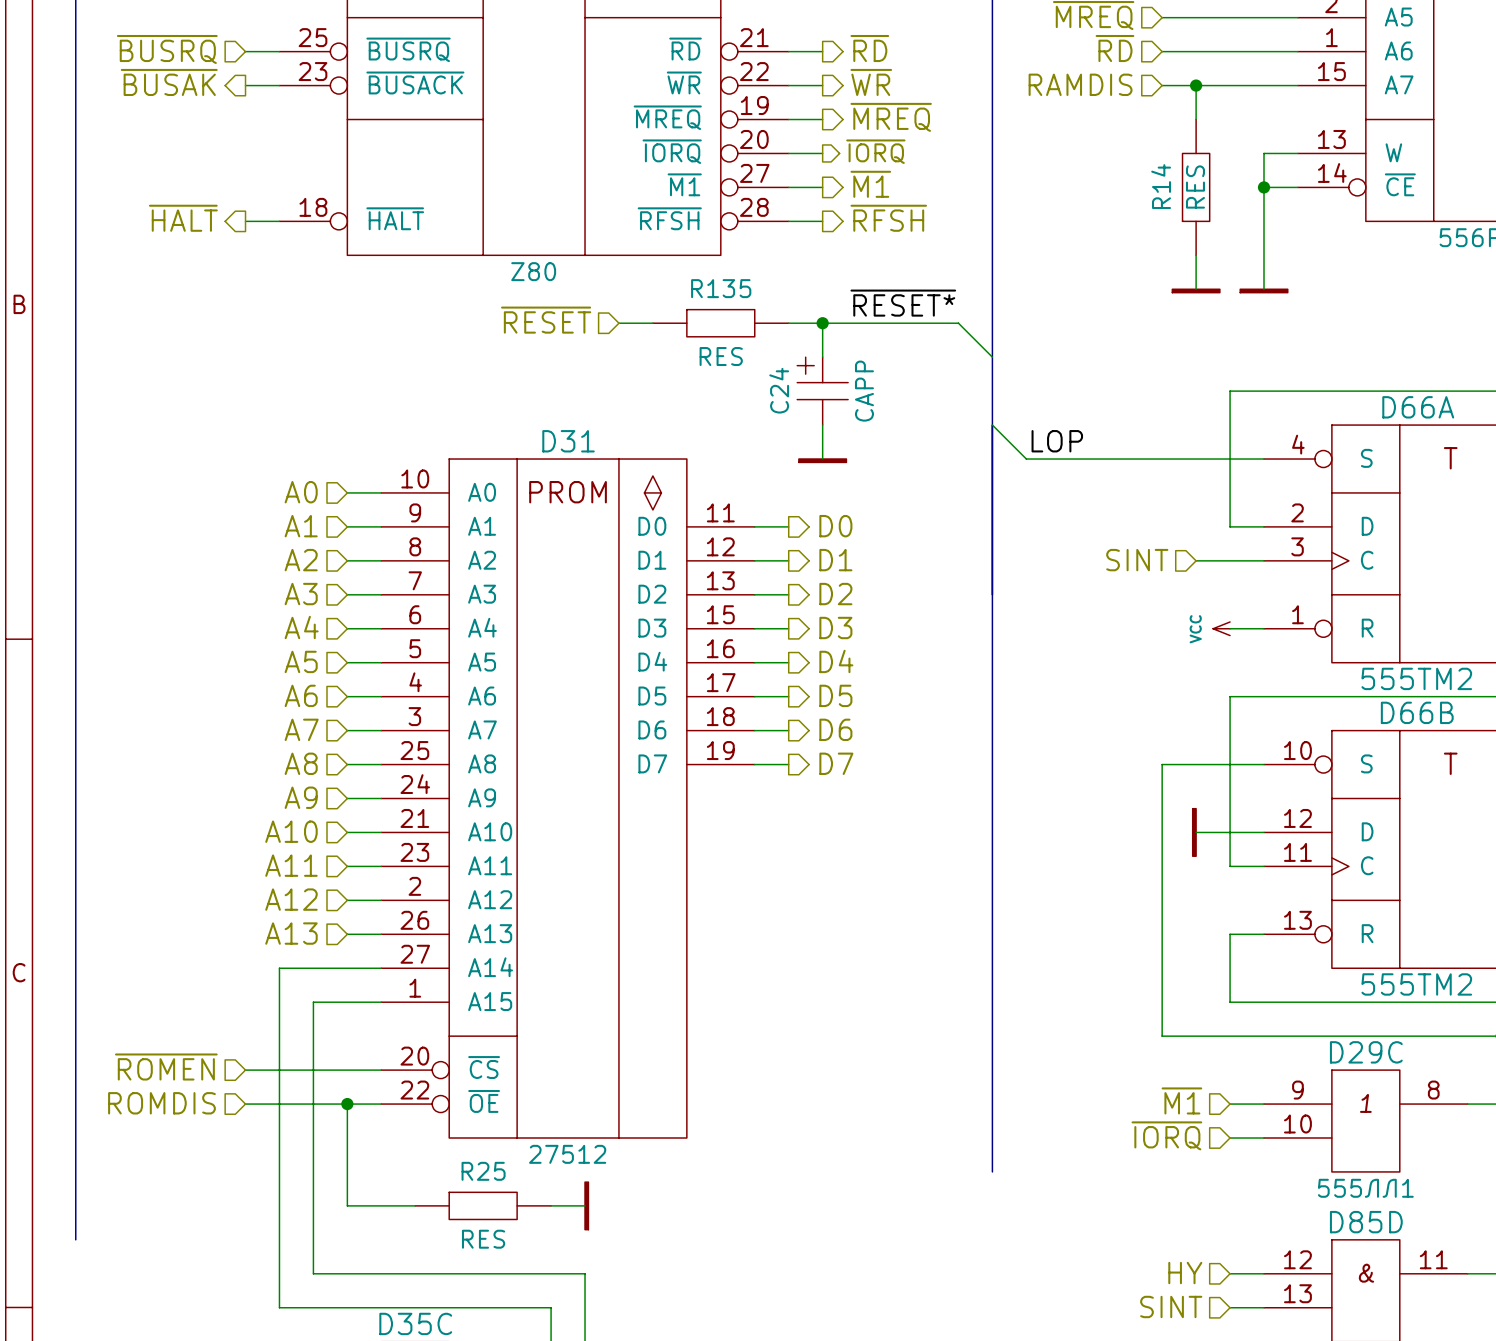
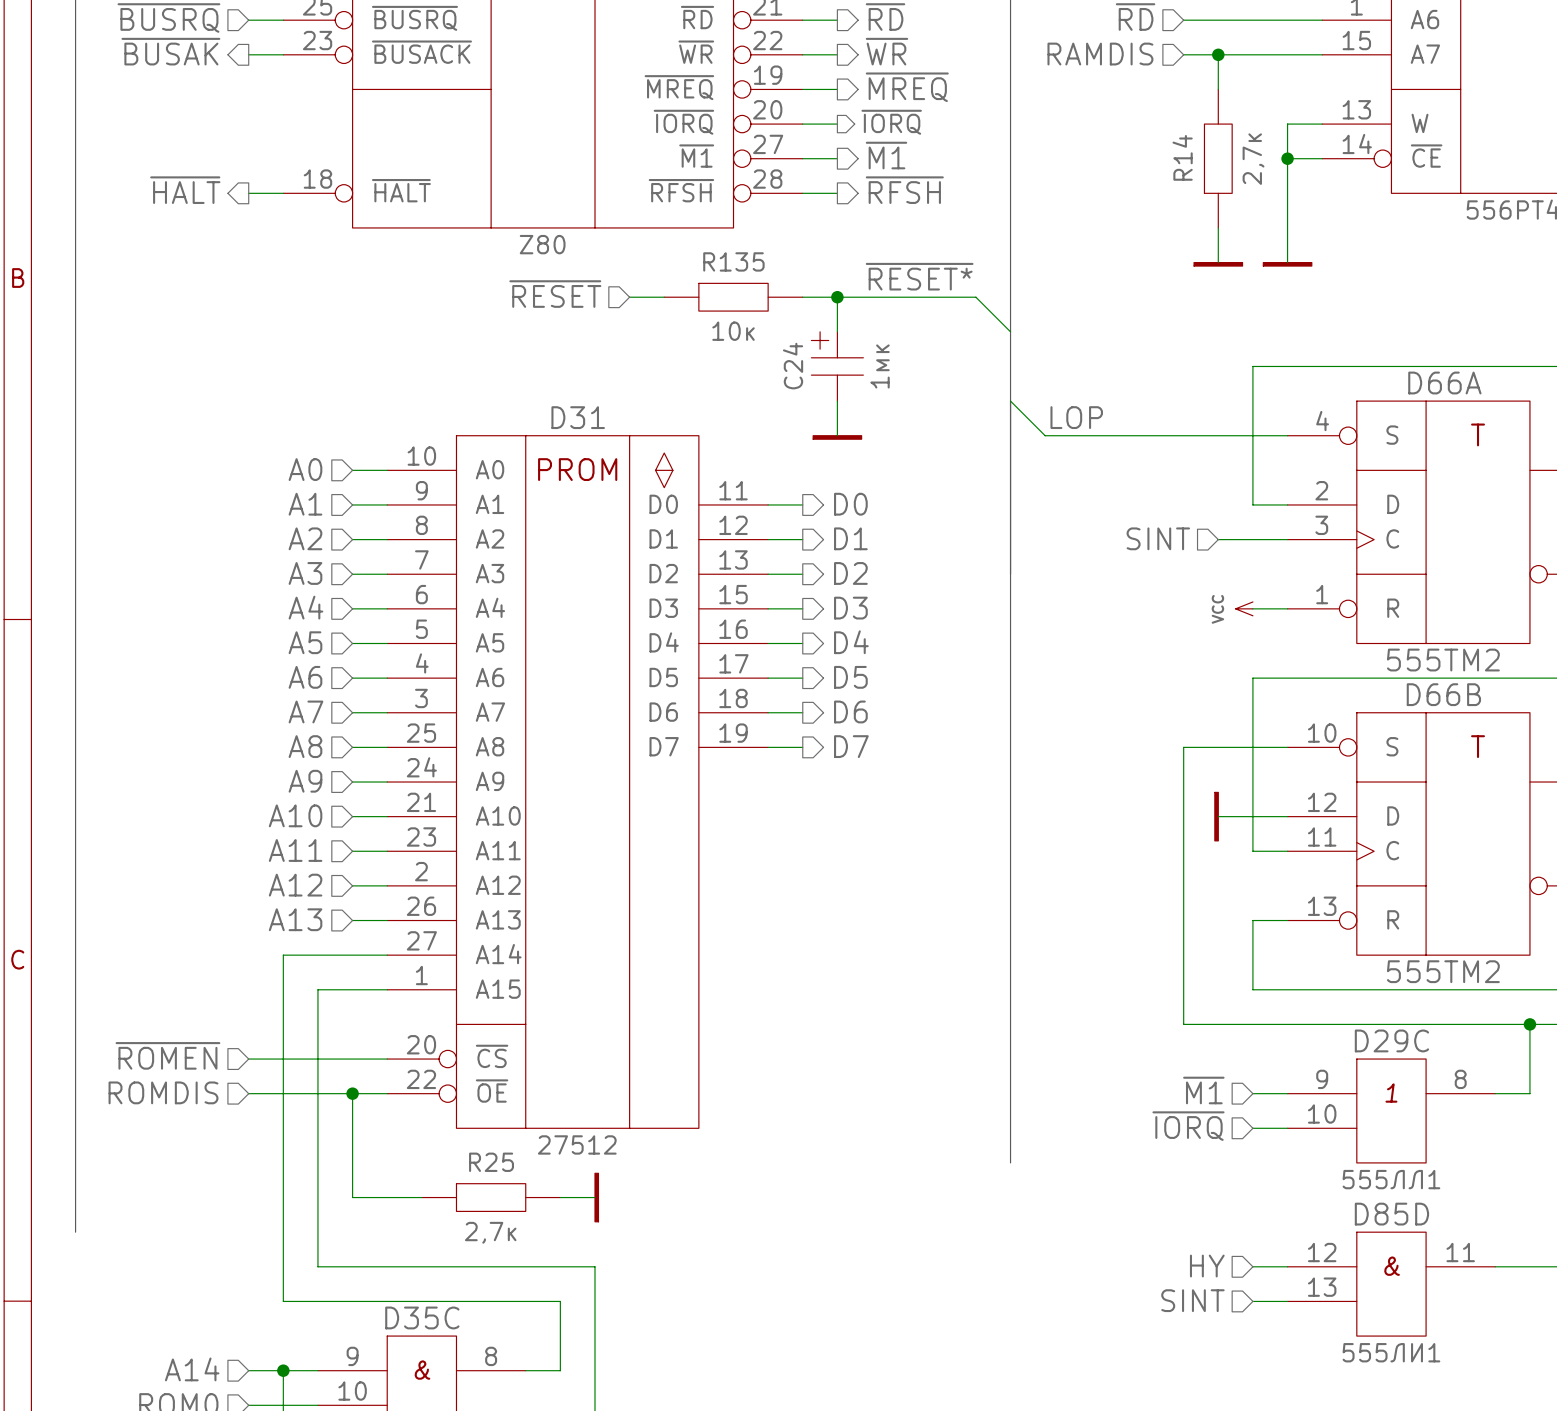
R14 value: RES (1195, 187) -> 2,7к (1253, 159)
R135 value: RES (721, 356) -> 10к (733, 331)
C24 value: CAPP (864, 391) -> 1мк (880, 366)
R25 value: RES (483, 1239) -> 2,7к (490, 1232)

